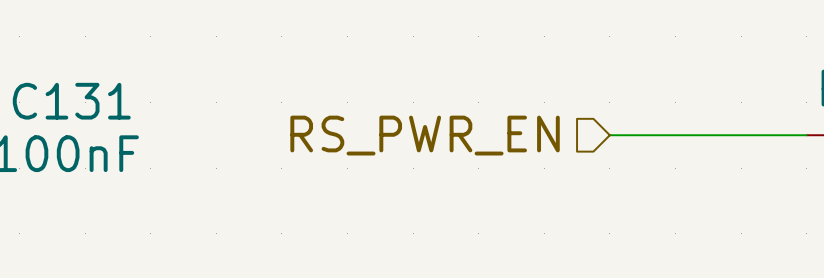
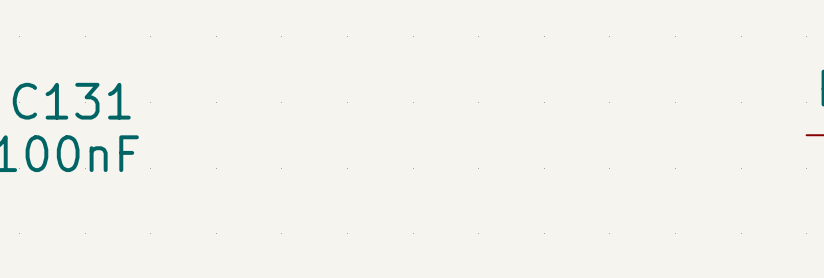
hierarchical label: RS_PWR_EN (425, 135) -> none
wire: (609, 135) (806, 135) -> none

